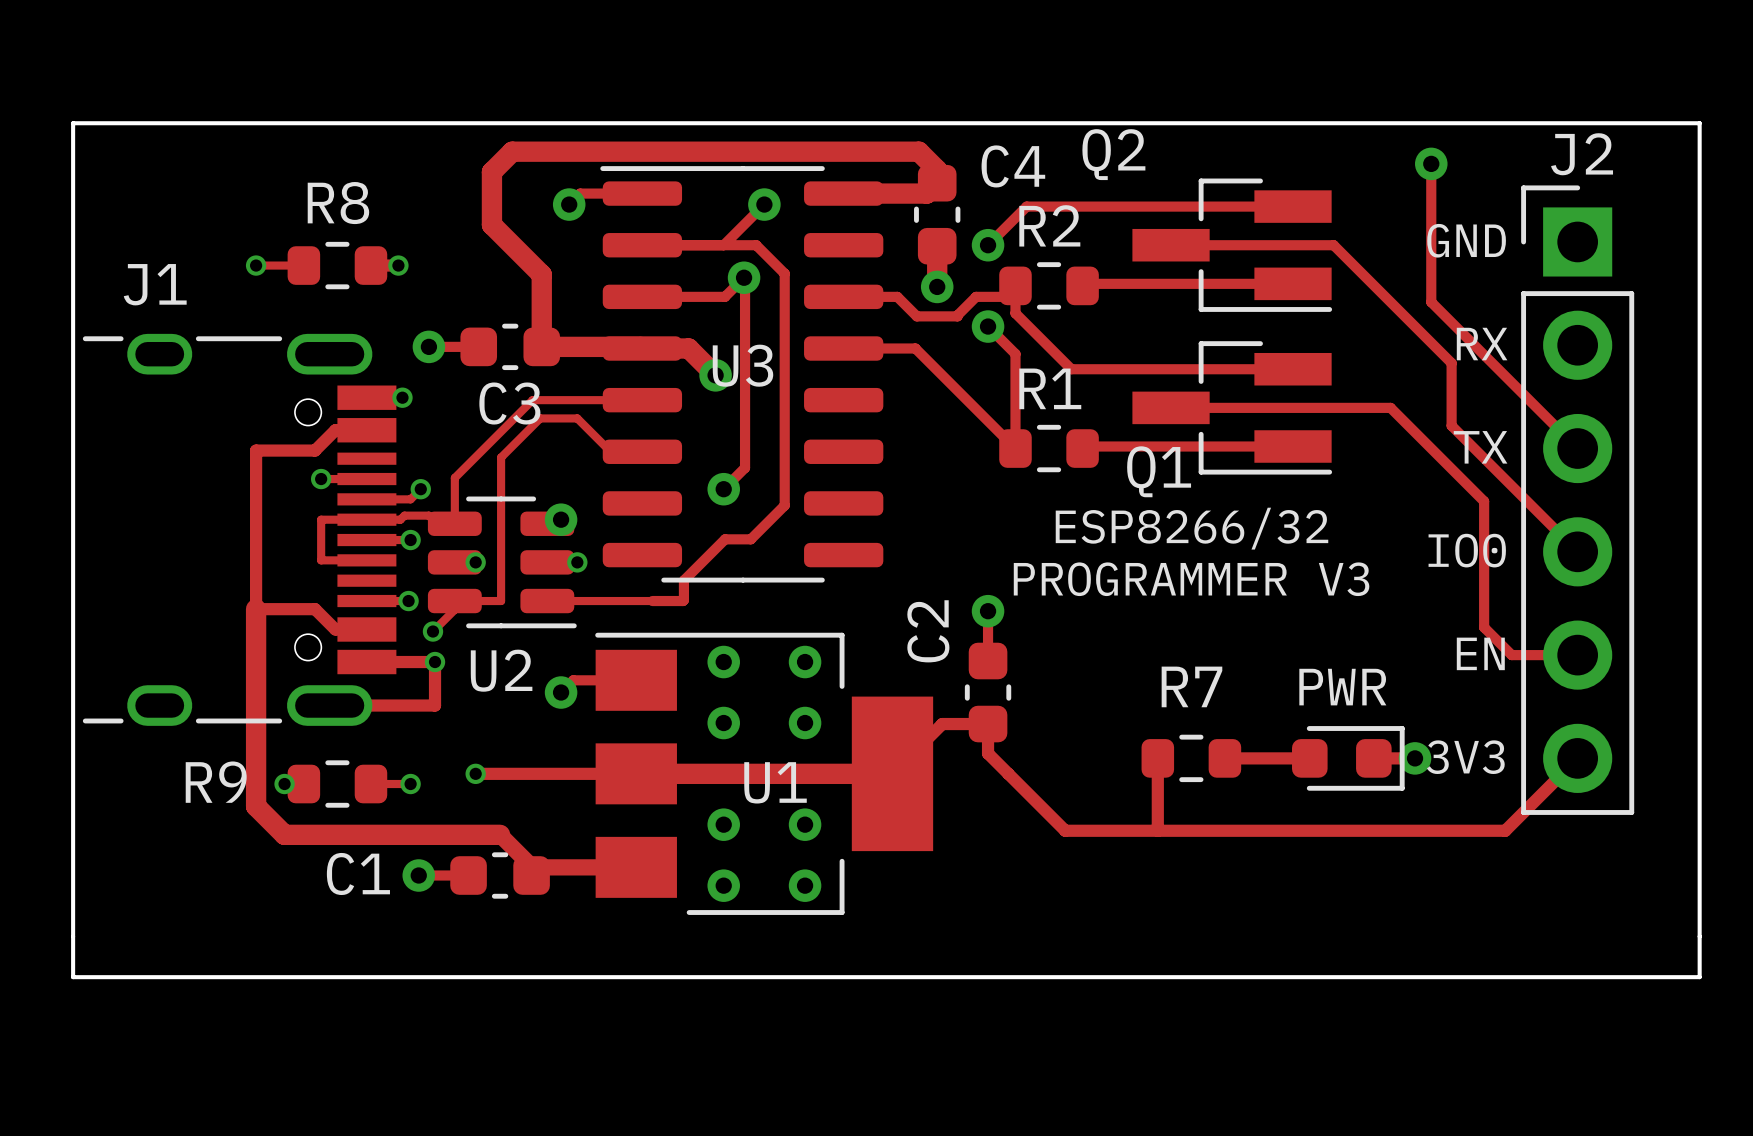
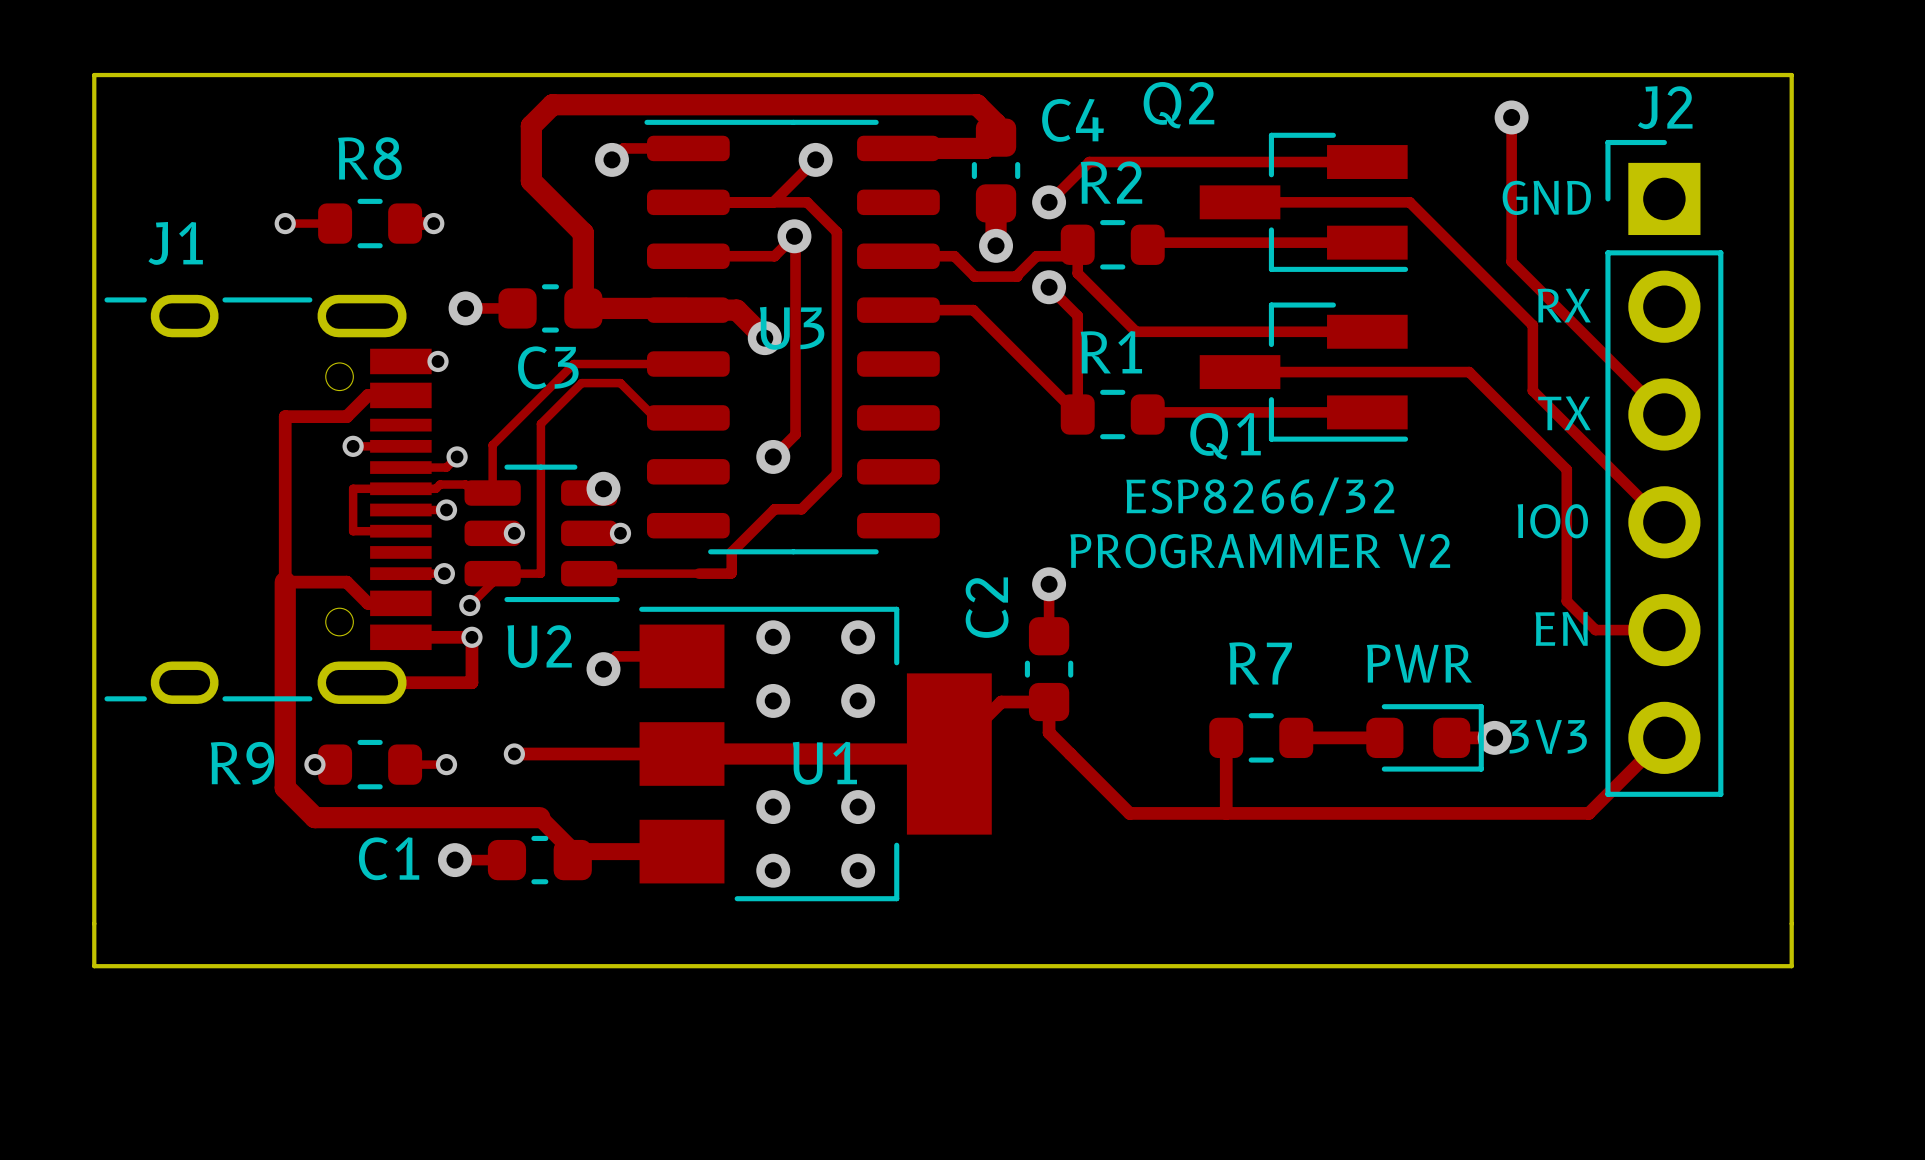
text: PROGRAMMER V3 (1191, 579) -> PROGRAMMER V2 (1260, 551)

